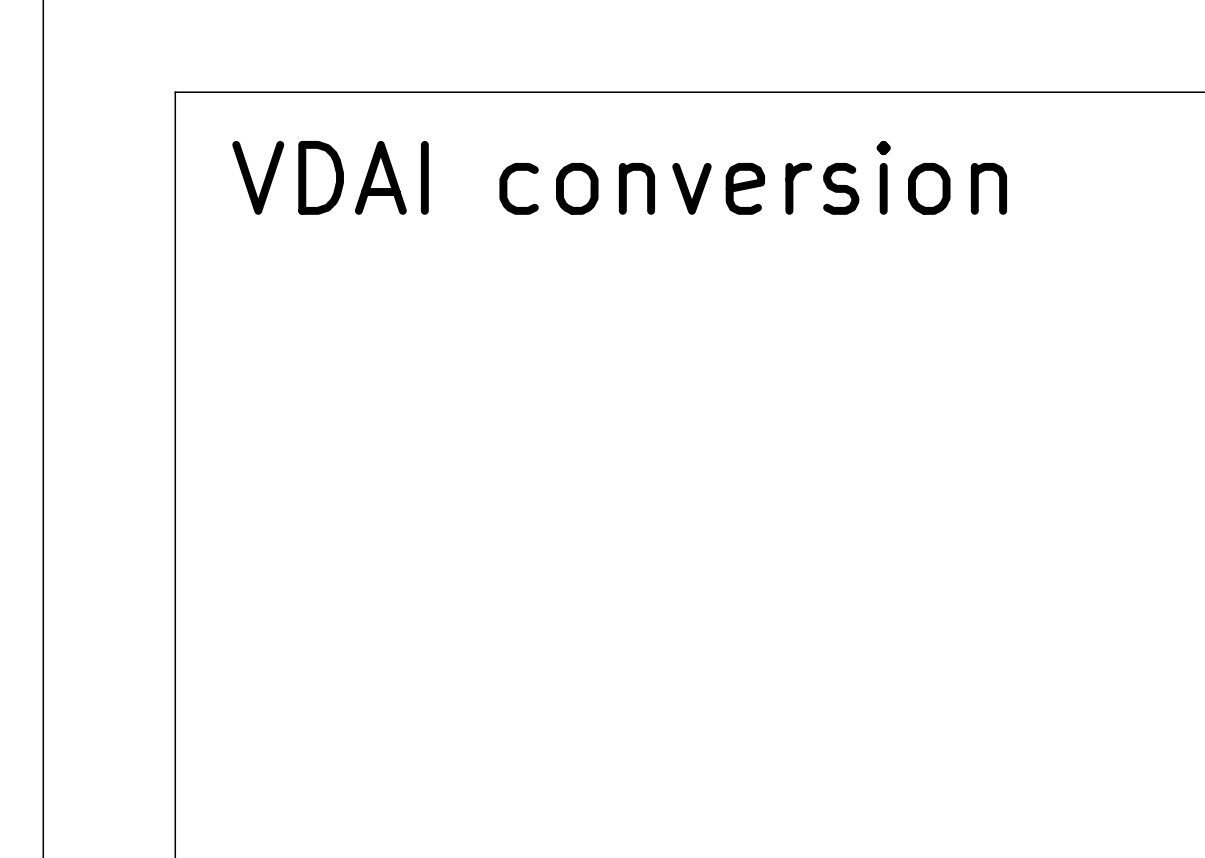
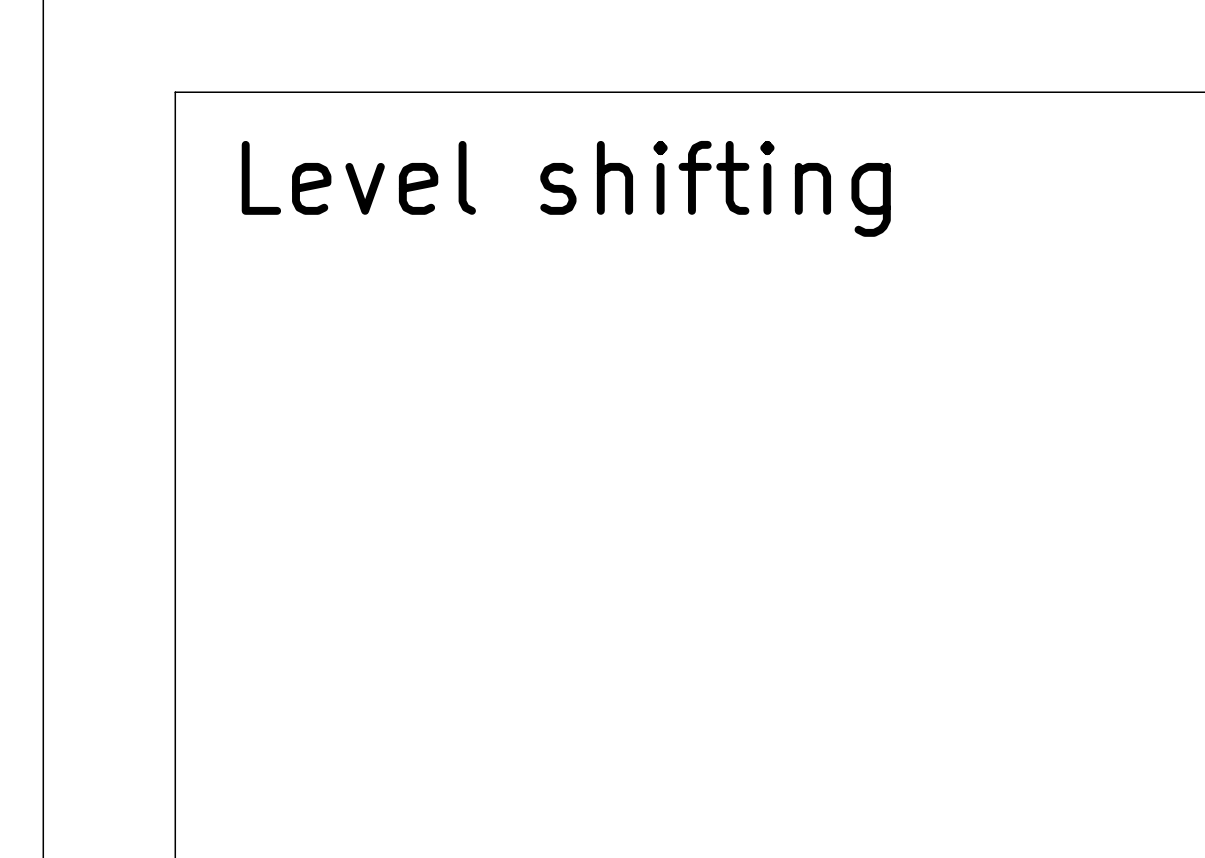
text: VDAI conversion (619, 177) -> Level shifting (566, 188)

